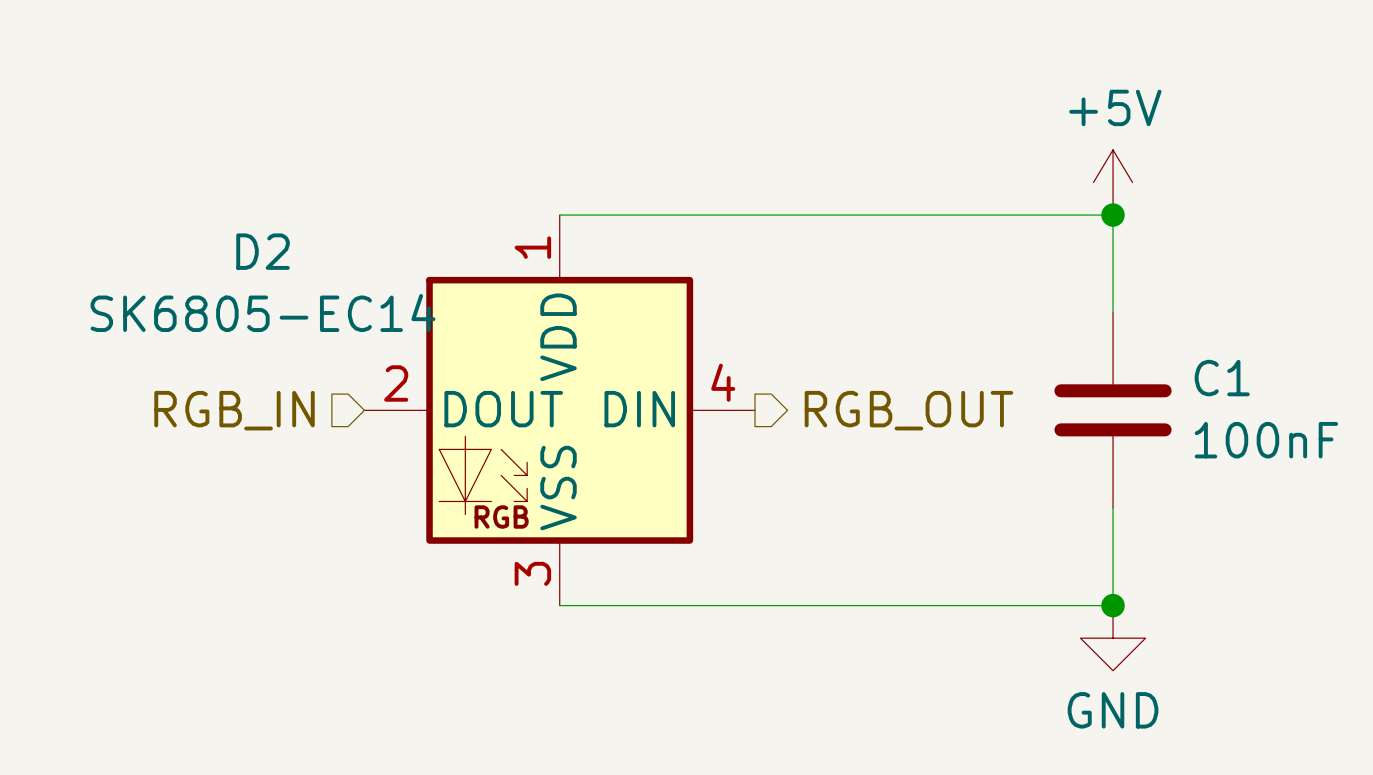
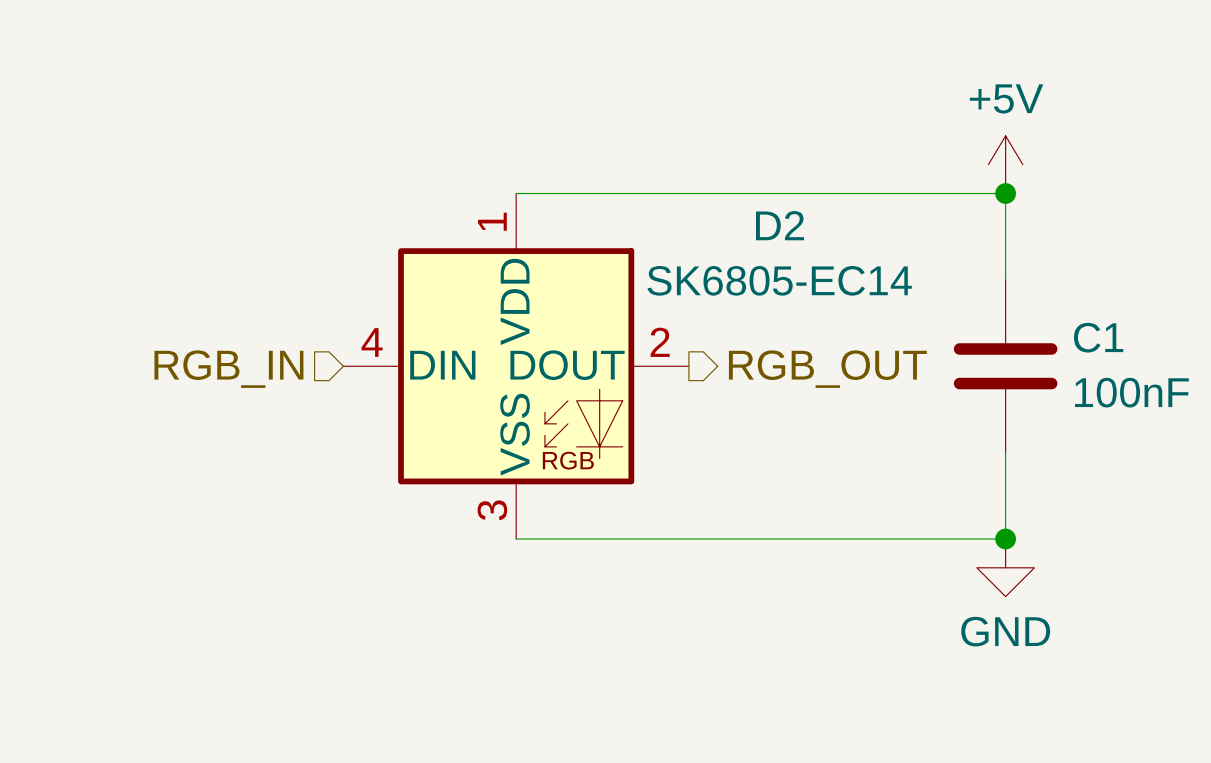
D2 flip: as is (559, 410) -> left-right (516, 366)

